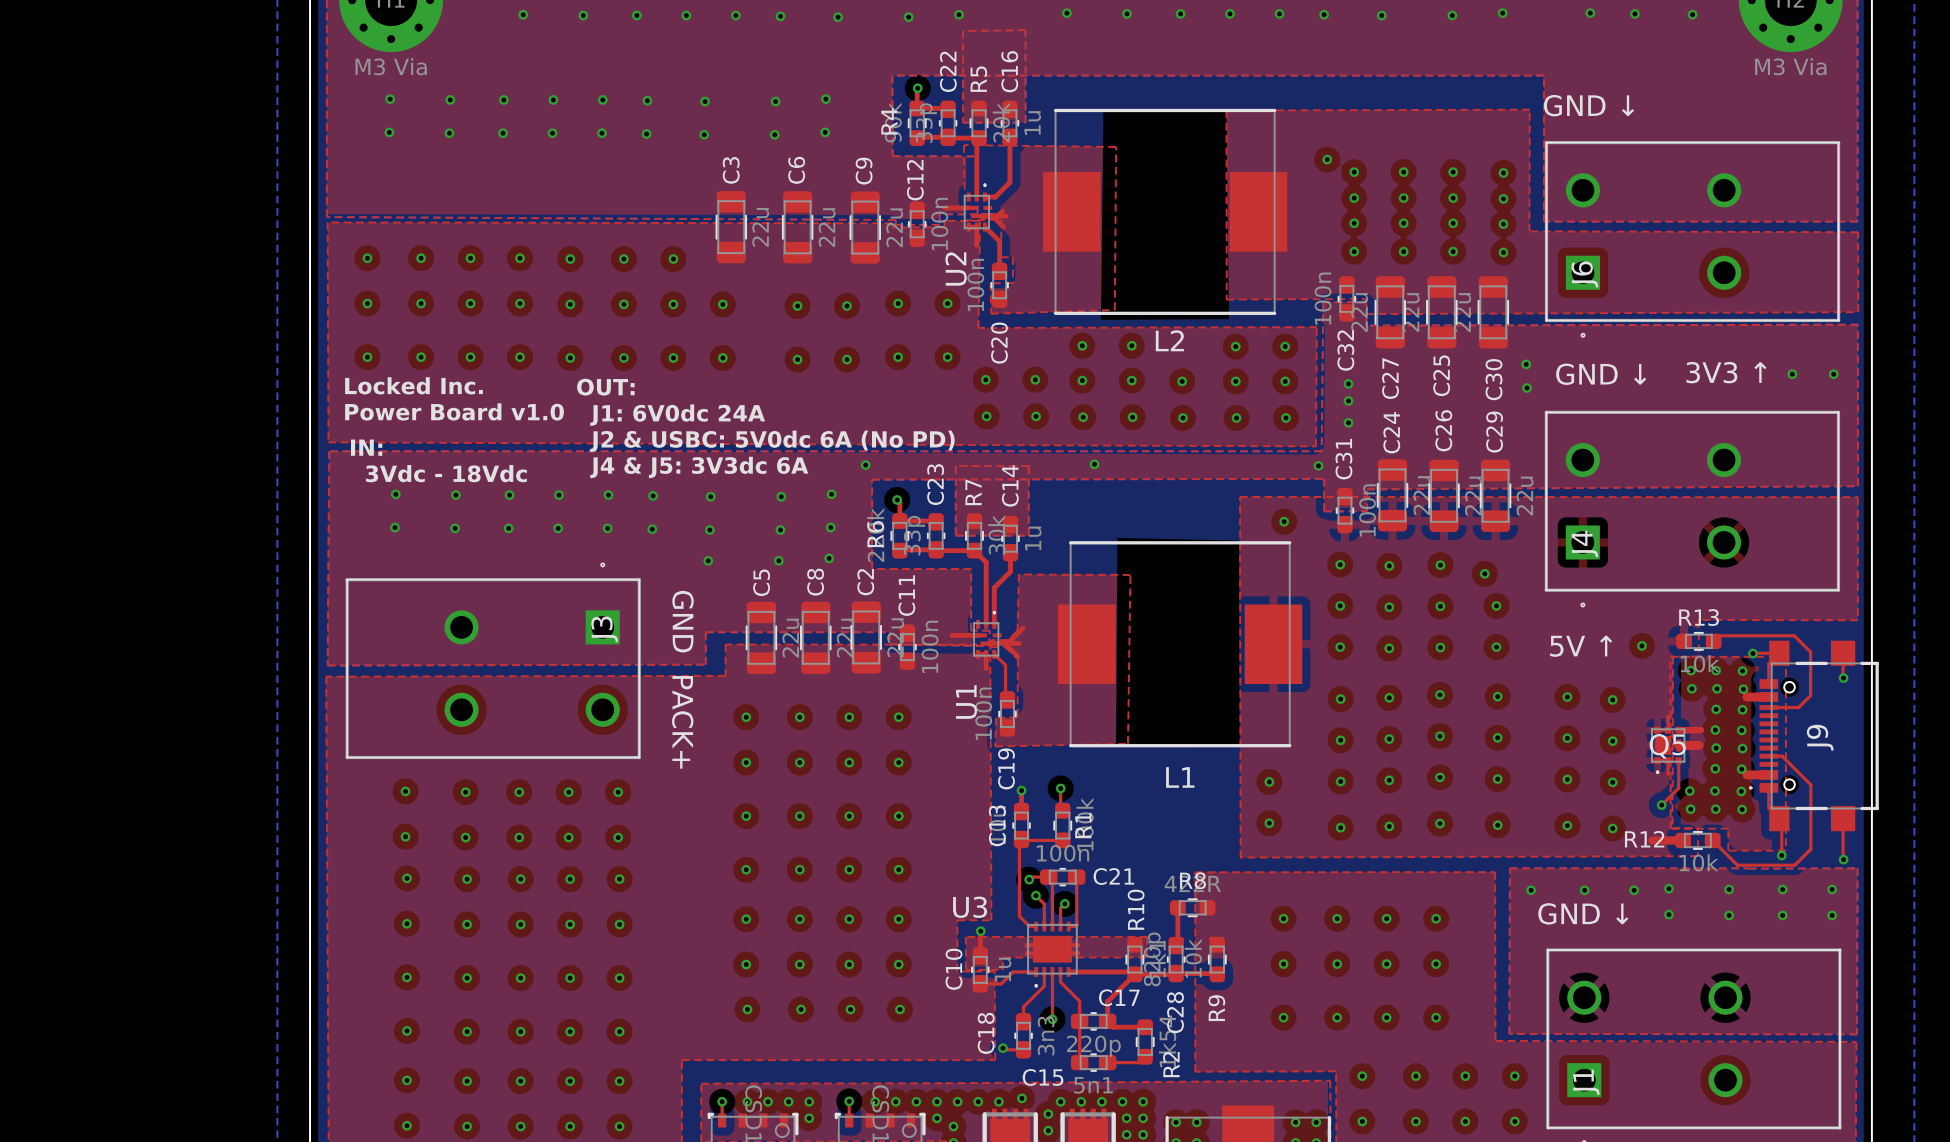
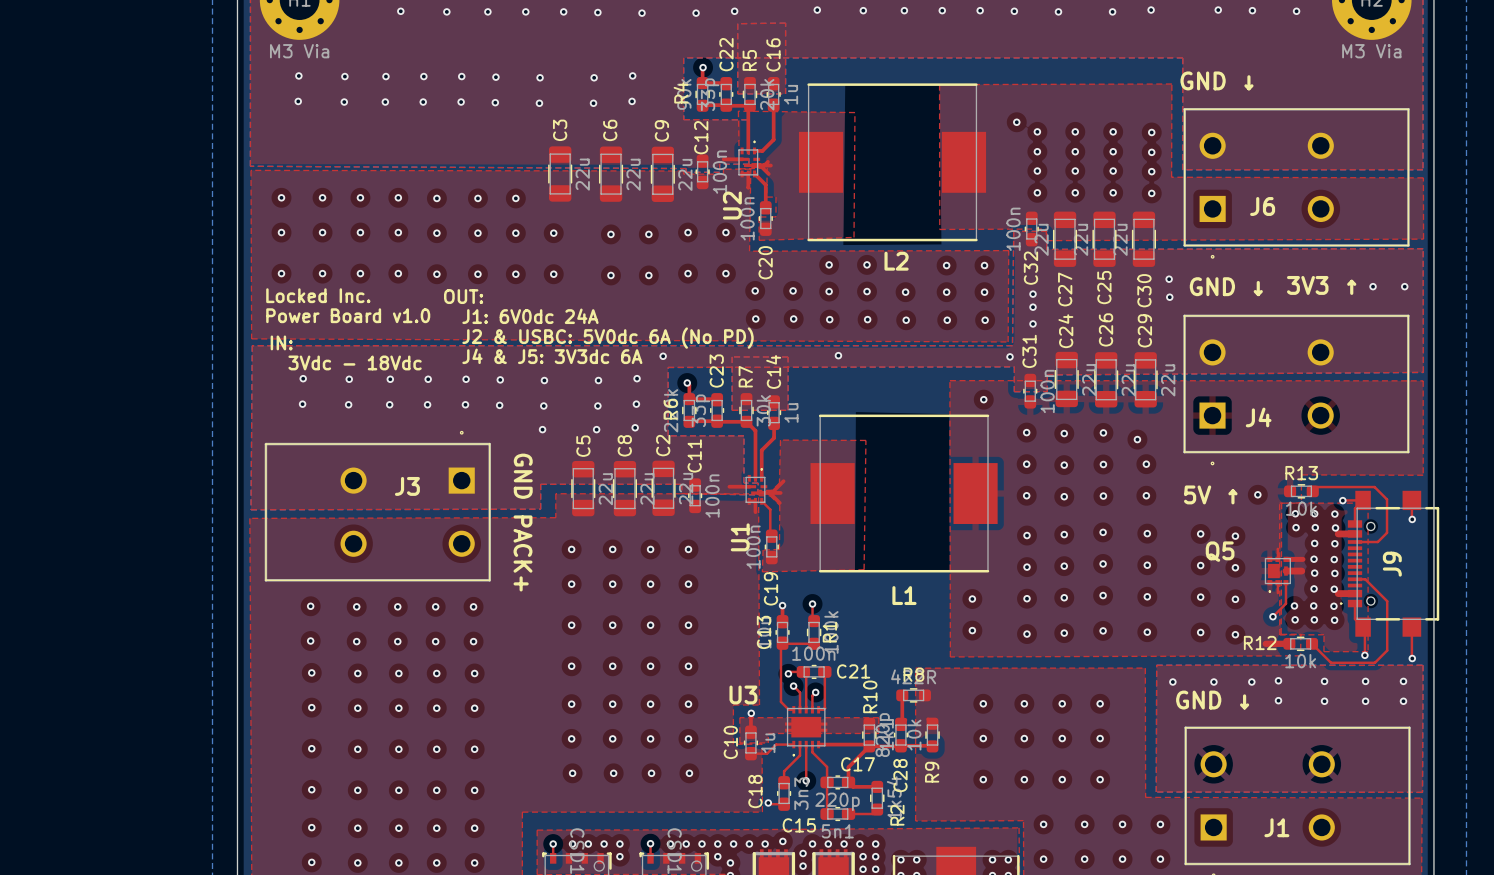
J6 name rotation: 0° (1584, 274) -> 90° clockwise (1262, 206)
J6 name position: J6 (1584, 274) -> J6 (1262, 206)
J4 name rotation: 0° (1584, 544) -> 90° clockwise (1258, 417)
J4 name position: J4 (1584, 544) -> J4 (1258, 417)
J3 name rotation: 0° (604, 629) -> 90° clockwise (407, 486)
J3 name position: J3 (604, 629) -> J3 (407, 486)
Q5 name position: Q5 (1667, 746) -> Q5 (1220, 551)
J1 name rotation: 0° (1586, 1082) -> 90° clockwise (1276, 827)
J1 name position: J1 (1586, 1082) -> J1 (1276, 827)

